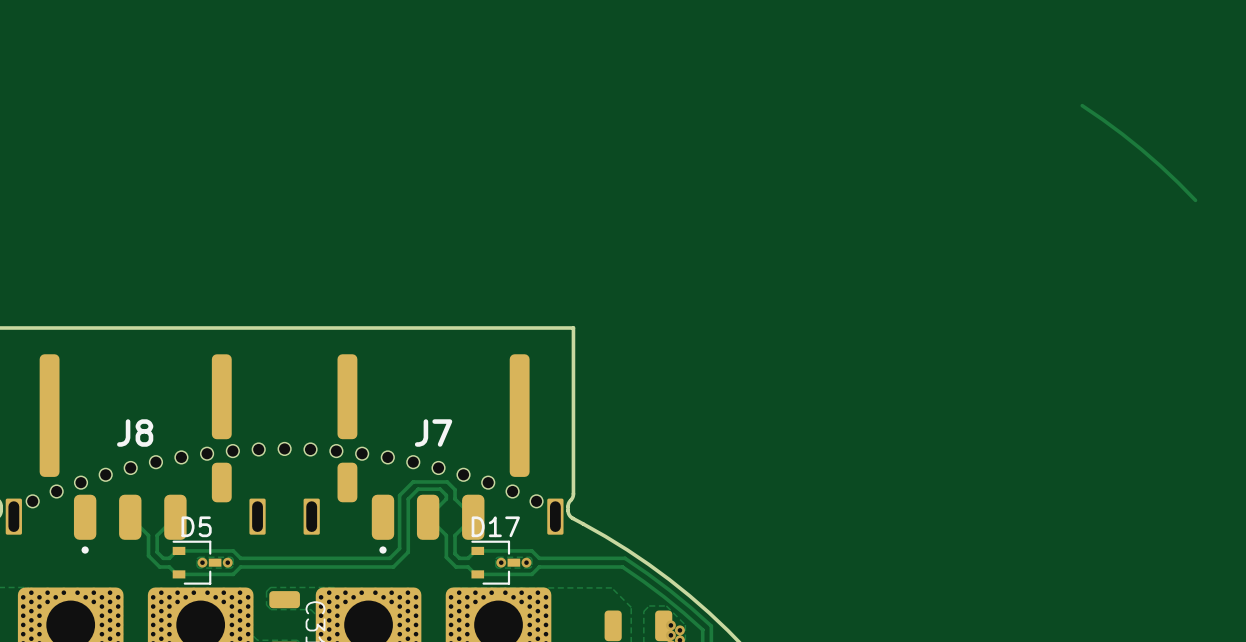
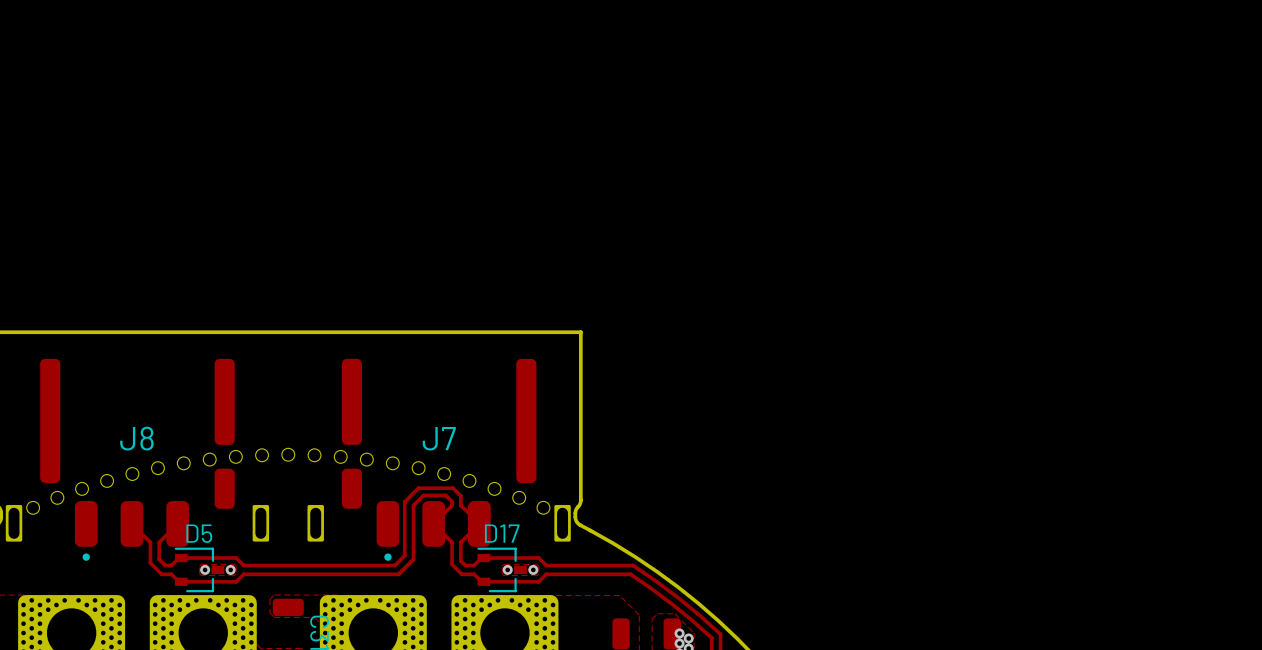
track: (1082, 105) (1141, 149) (1195, 200) -> none

